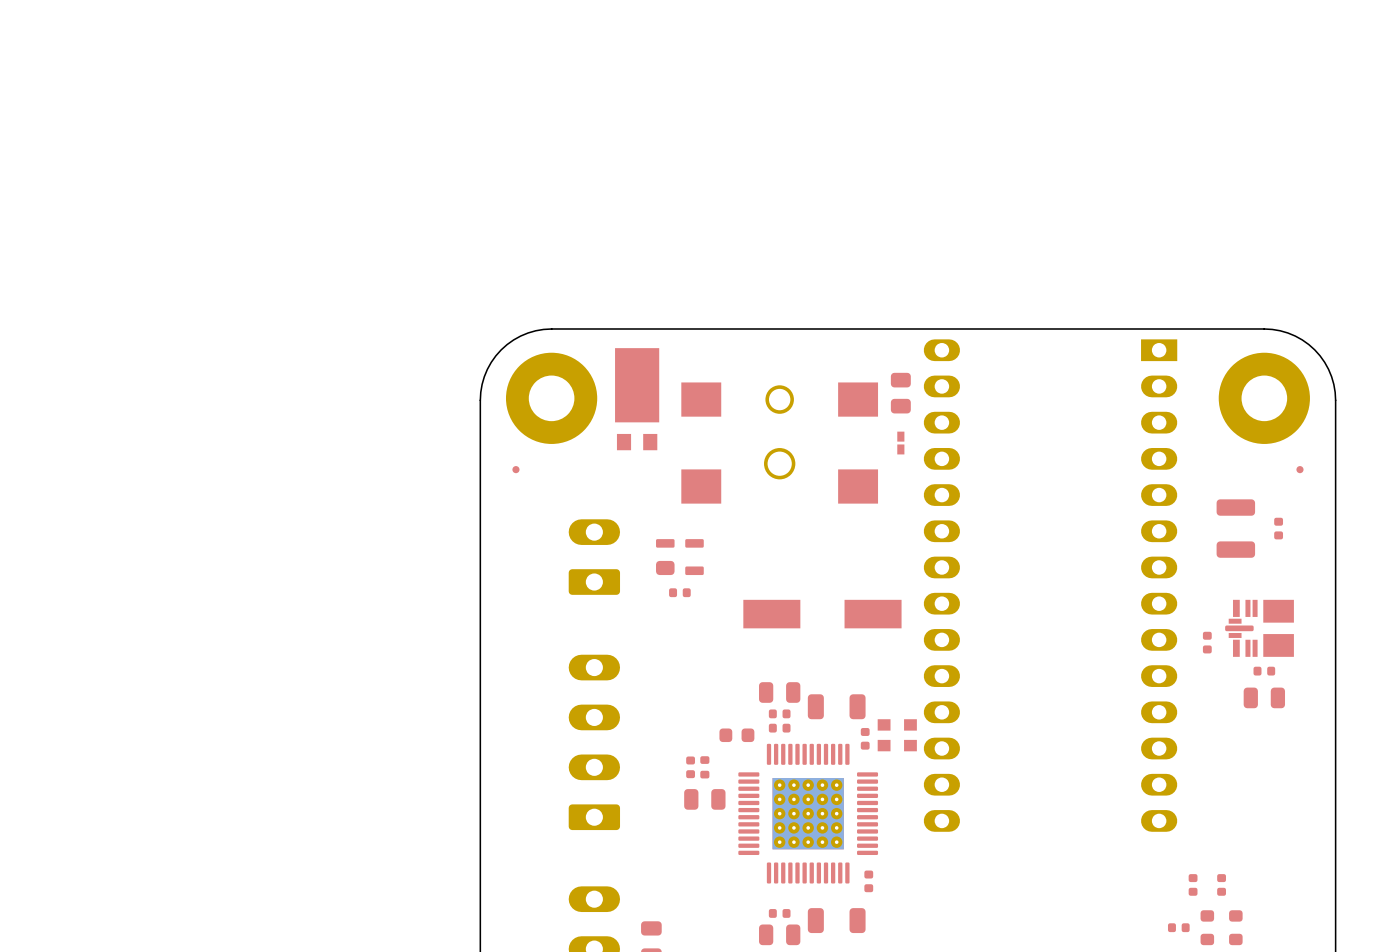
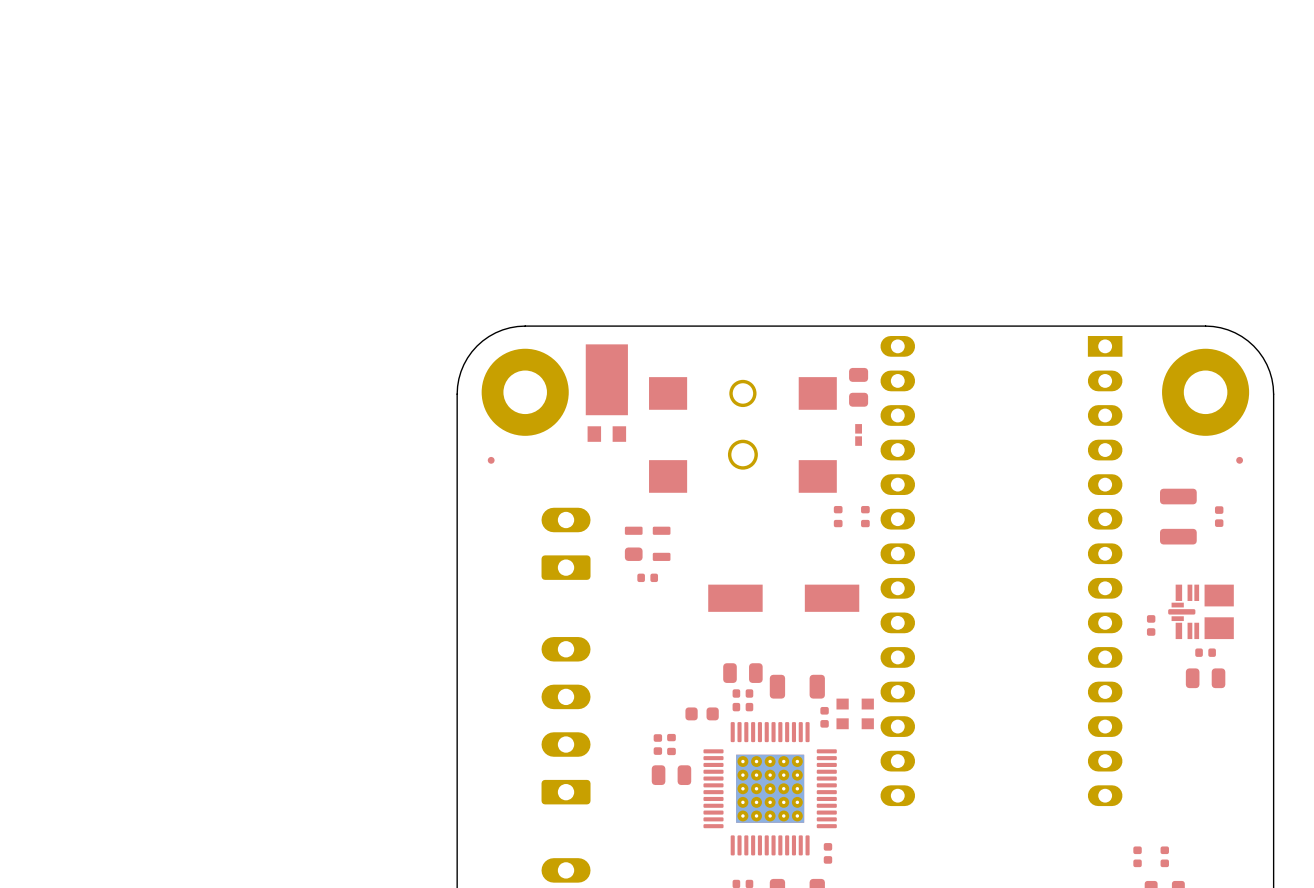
part: none -> (838, 516)
part: none -> (865, 516)

